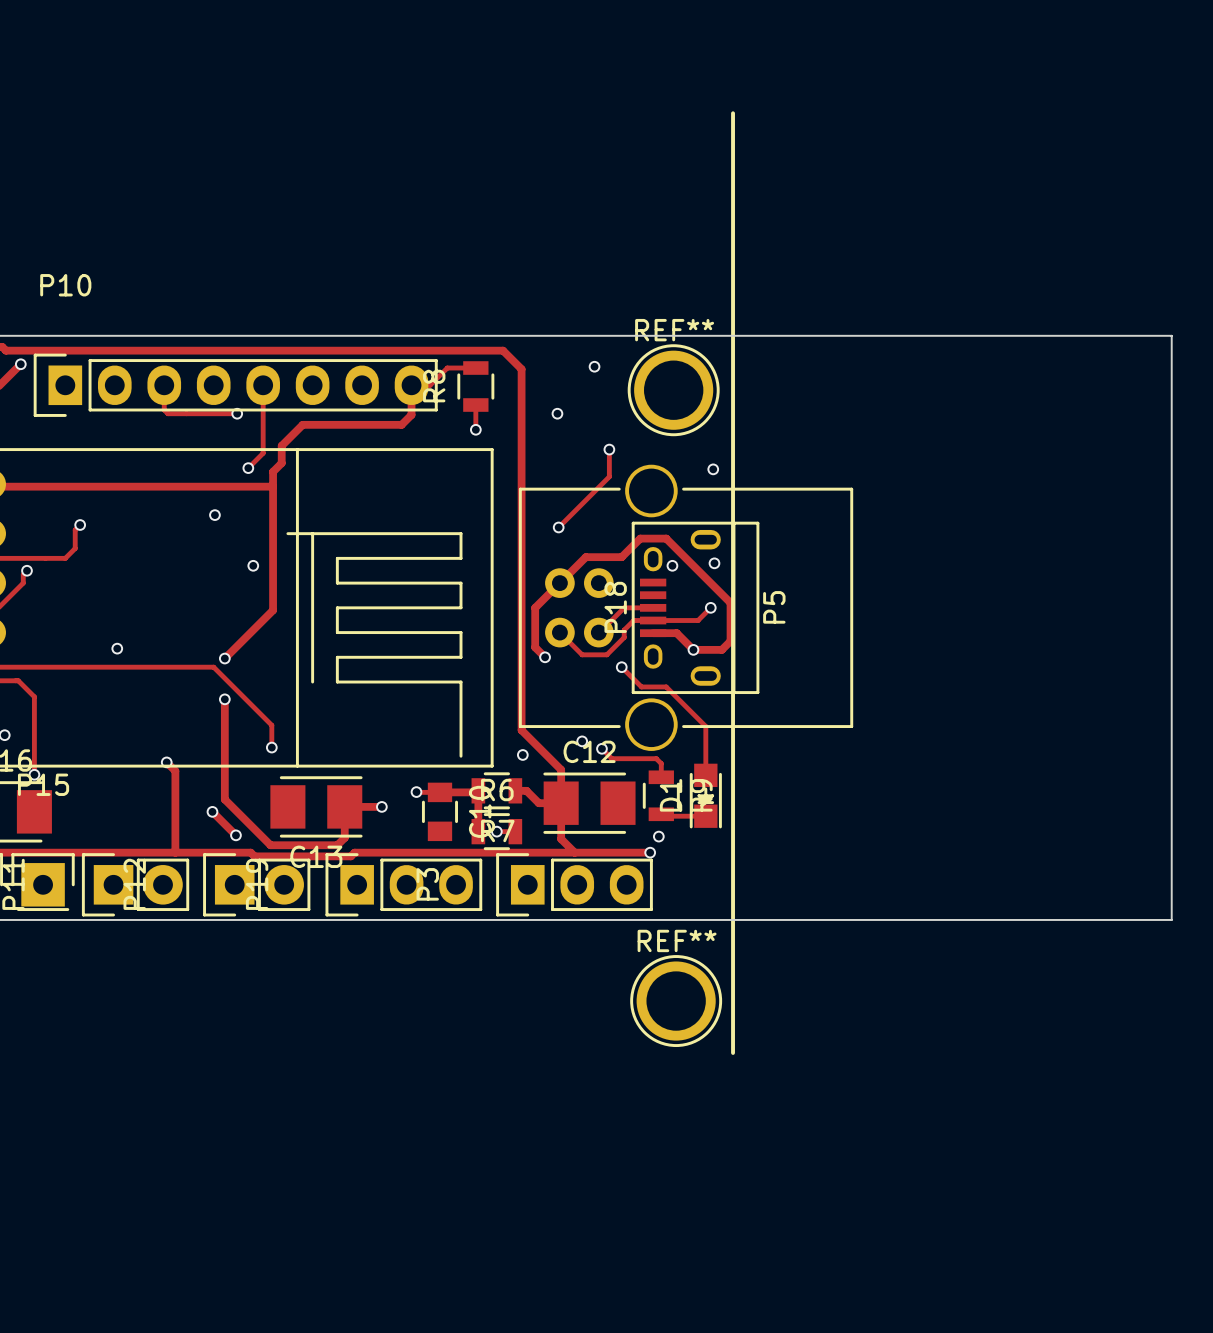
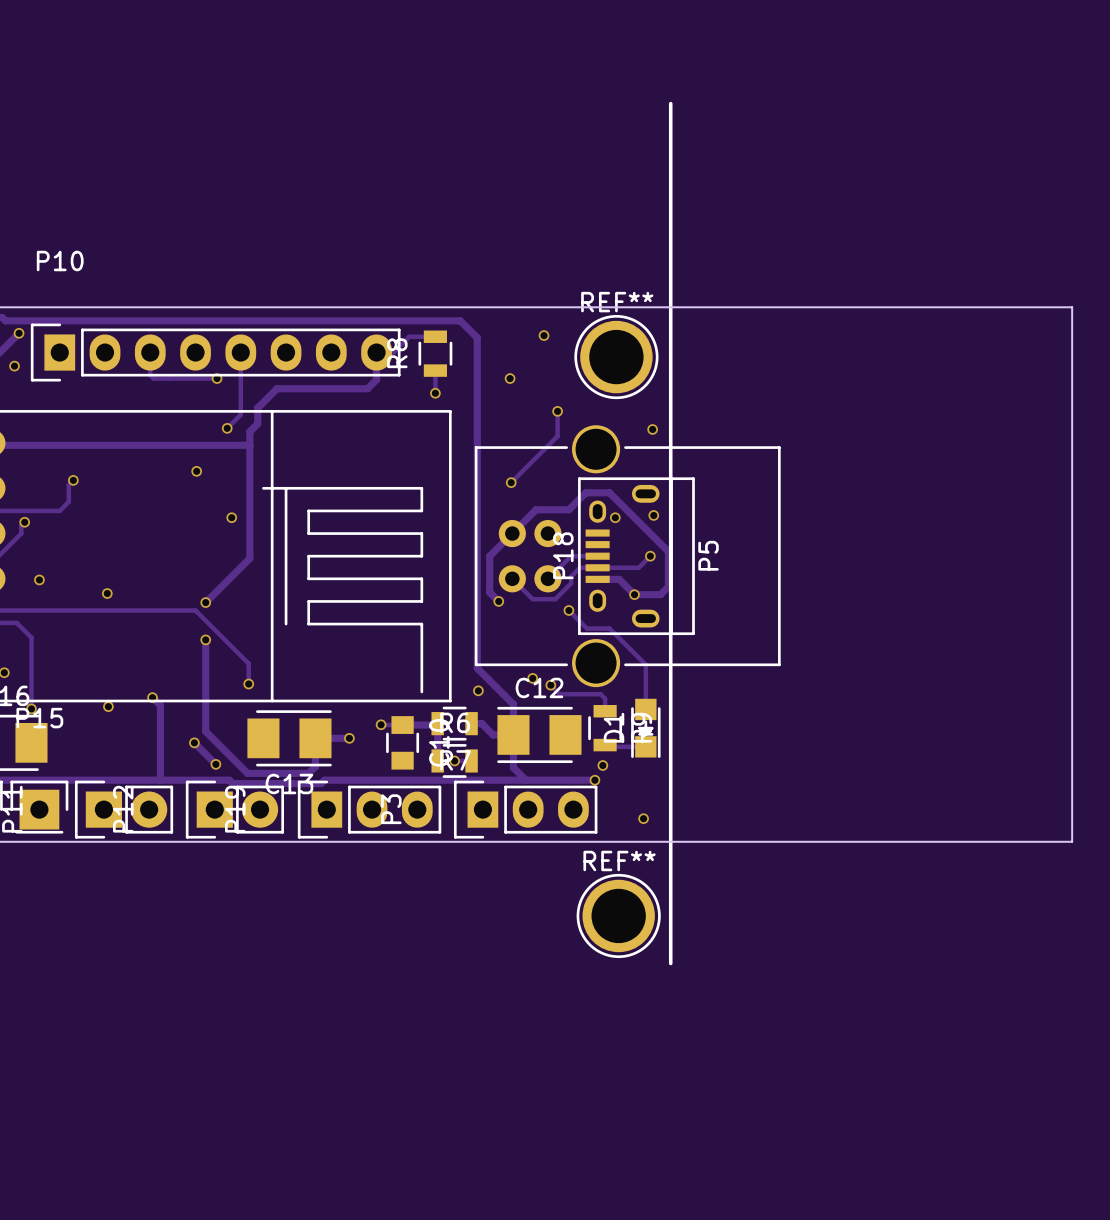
via: none -> (14, 366)
via: none -> (39, 579)
via: none -> (108, 706)
via: none -> (643, 818)

